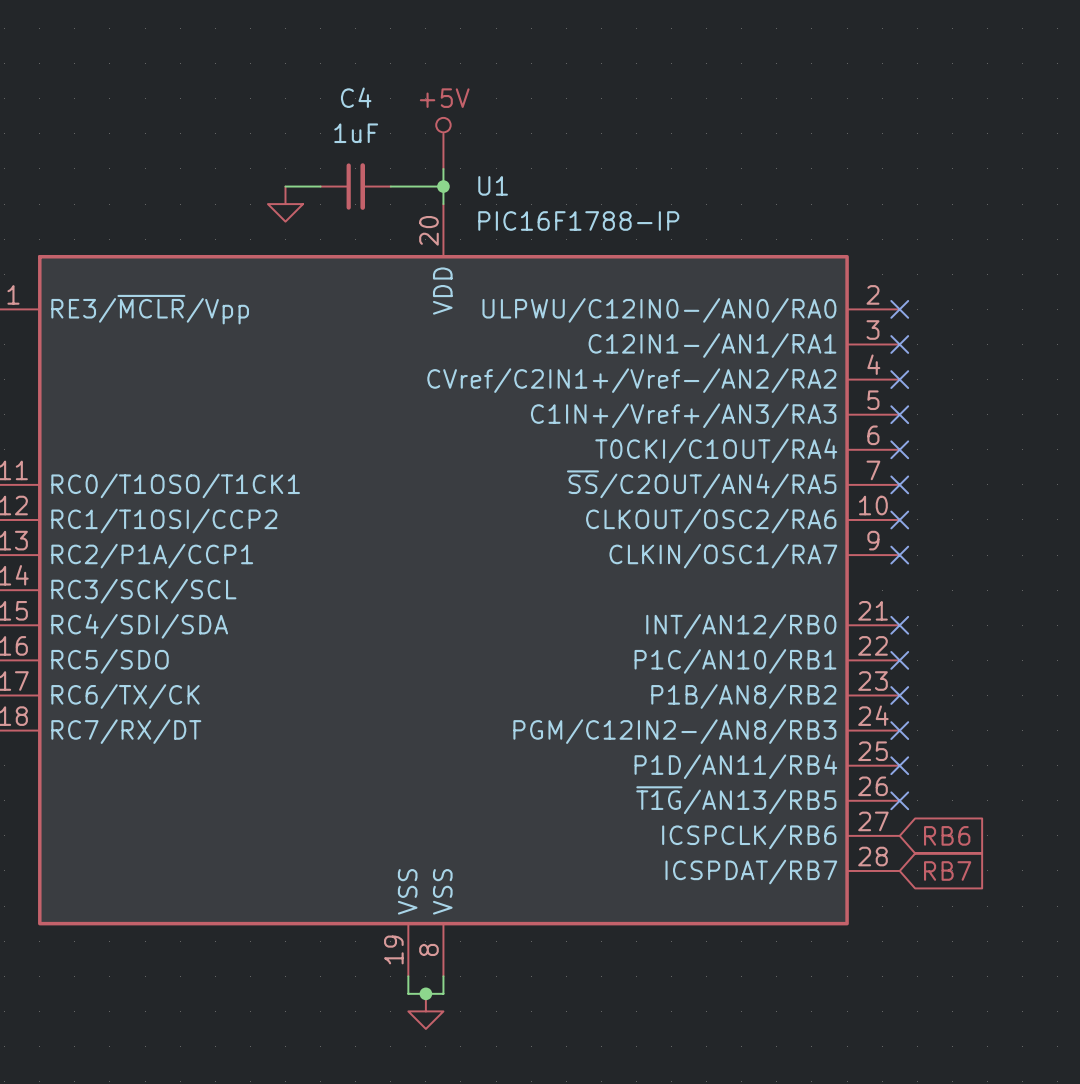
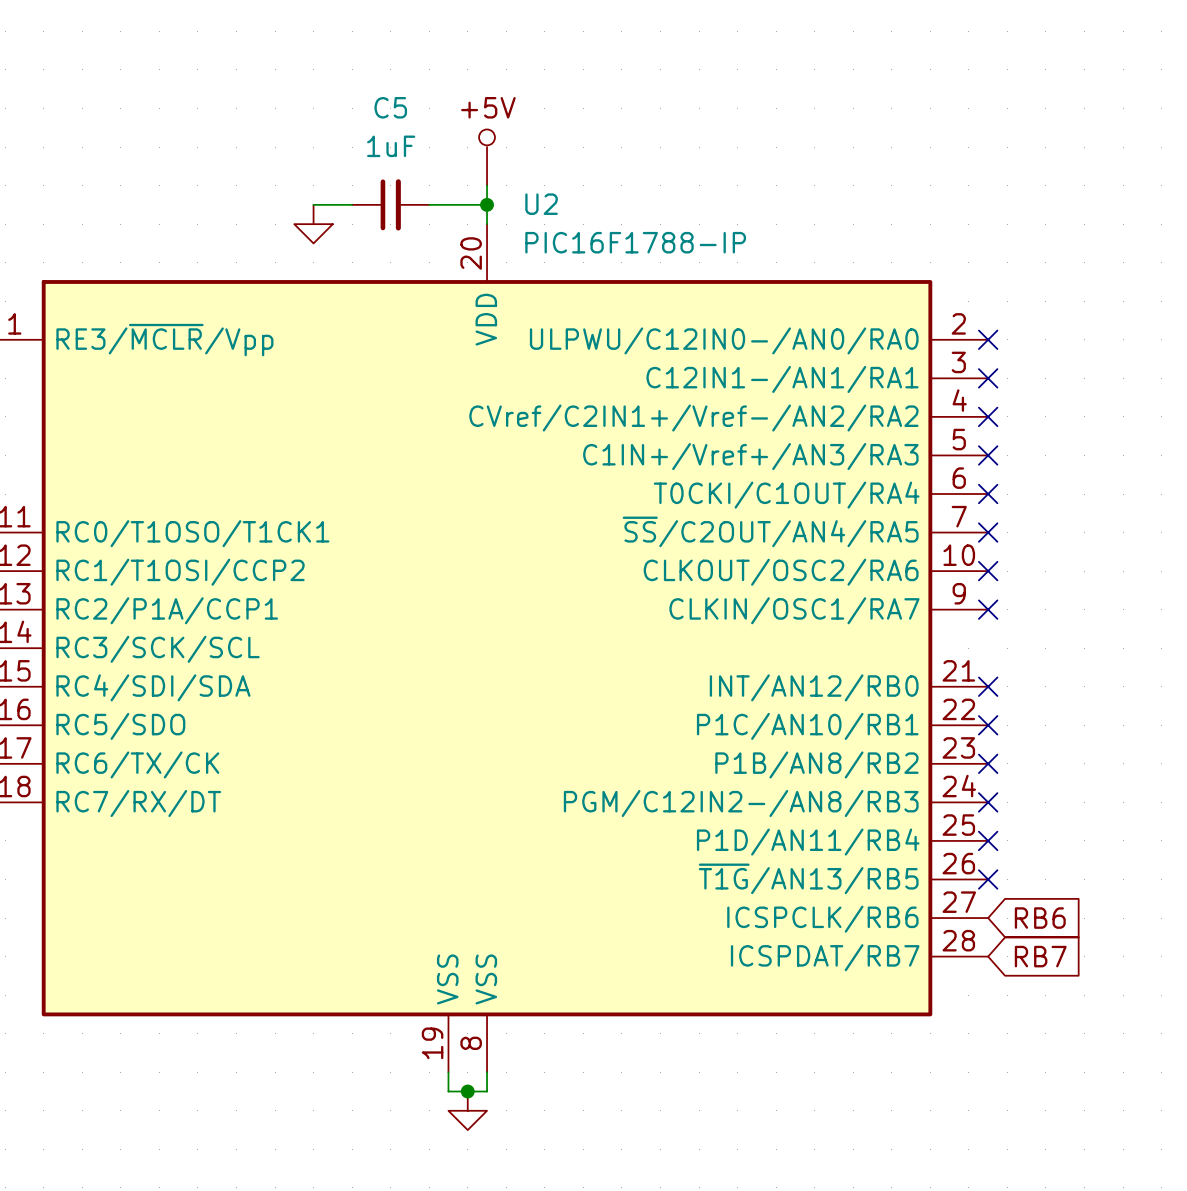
C4 name: C4 (356, 97) -> C5 (390, 107)
U1 name: U1 (493, 185) -> U2 (541, 204)

